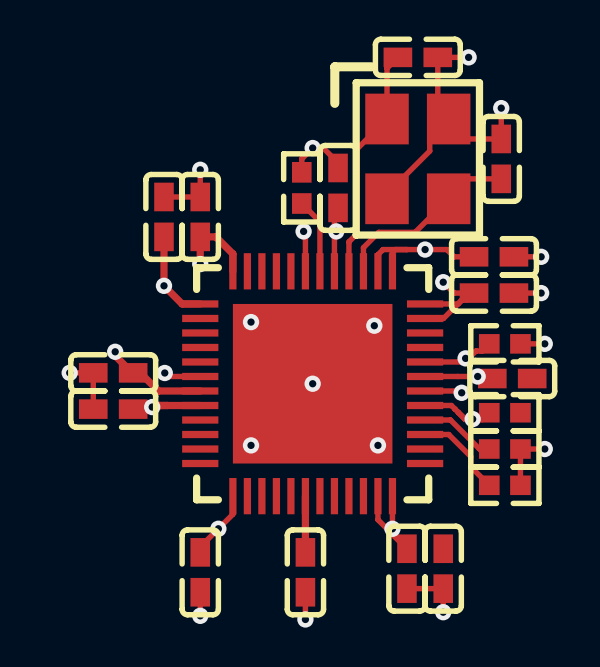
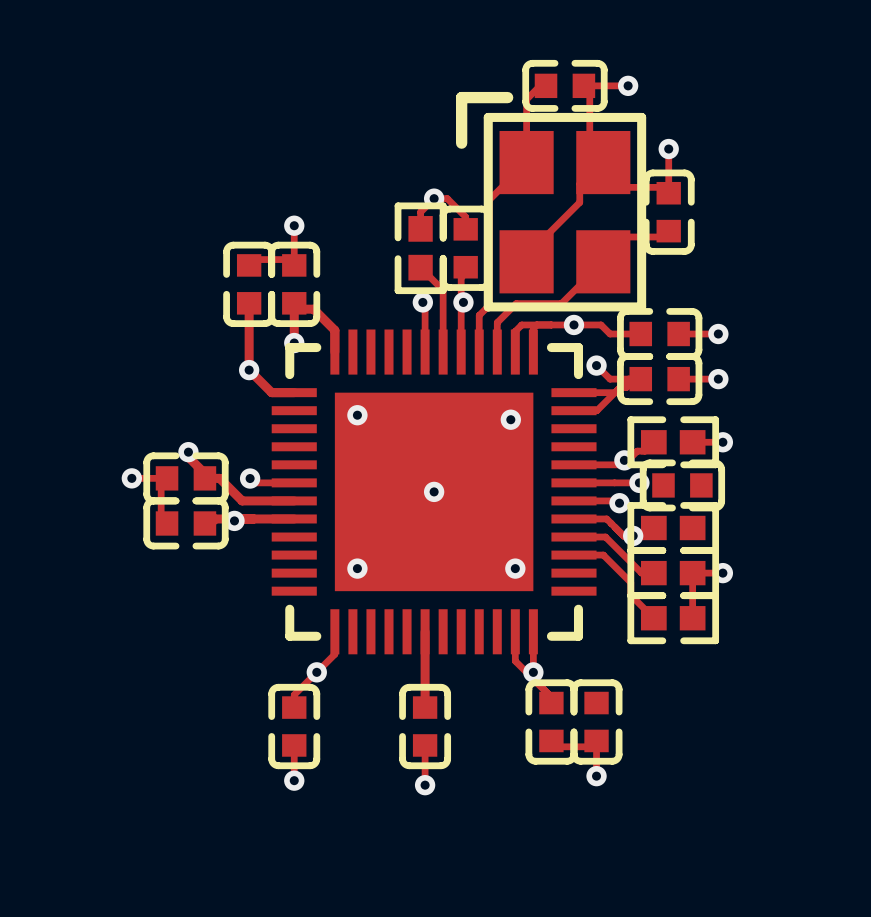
part footprint: [372, 36, 463, 79] -> [522, 59, 608, 112]
part footprint: [480, 113, 523, 205] -> [642, 169, 695, 255]
part footprint: [317, 142, 359, 234] -> [439, 205, 492, 291]
part footprint: [143, 171, 185, 263] -> [223, 241, 276, 328]
part footprint: [179, 171, 222, 263] -> [268, 241, 321, 328]
part footprint: [448, 235, 540, 278] -> [617, 308, 703, 360]
part footprint: [448, 272, 540, 314] -> [617, 353, 703, 406]
part footprint: [68, 352, 159, 394] -> [143, 452, 229, 505]
part footprint: [467, 357, 558, 400] -> [639, 459, 726, 512]
part footprint: [68, 388, 159, 430] -> [143, 497, 229, 550]
part footprint: [386, 523, 428, 614] -> [525, 679, 578, 765]
part footprint: [422, 523, 465, 614] -> [570, 679, 623, 765]
part footprint: [179, 527, 222, 618] -> [268, 683, 321, 770]
part footprint: [284, 527, 327, 618] -> [399, 683, 452, 770]

